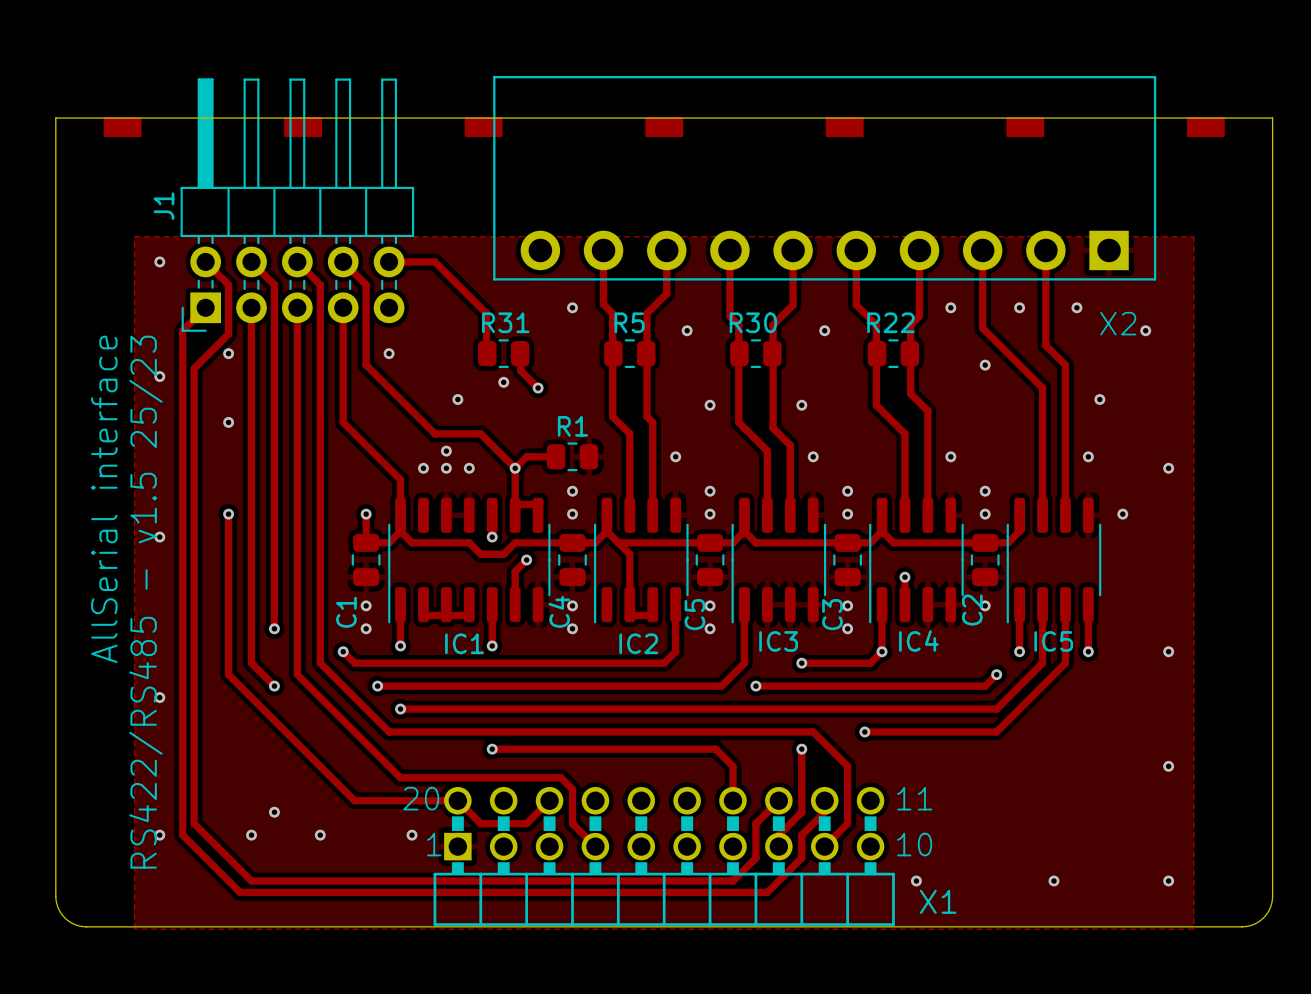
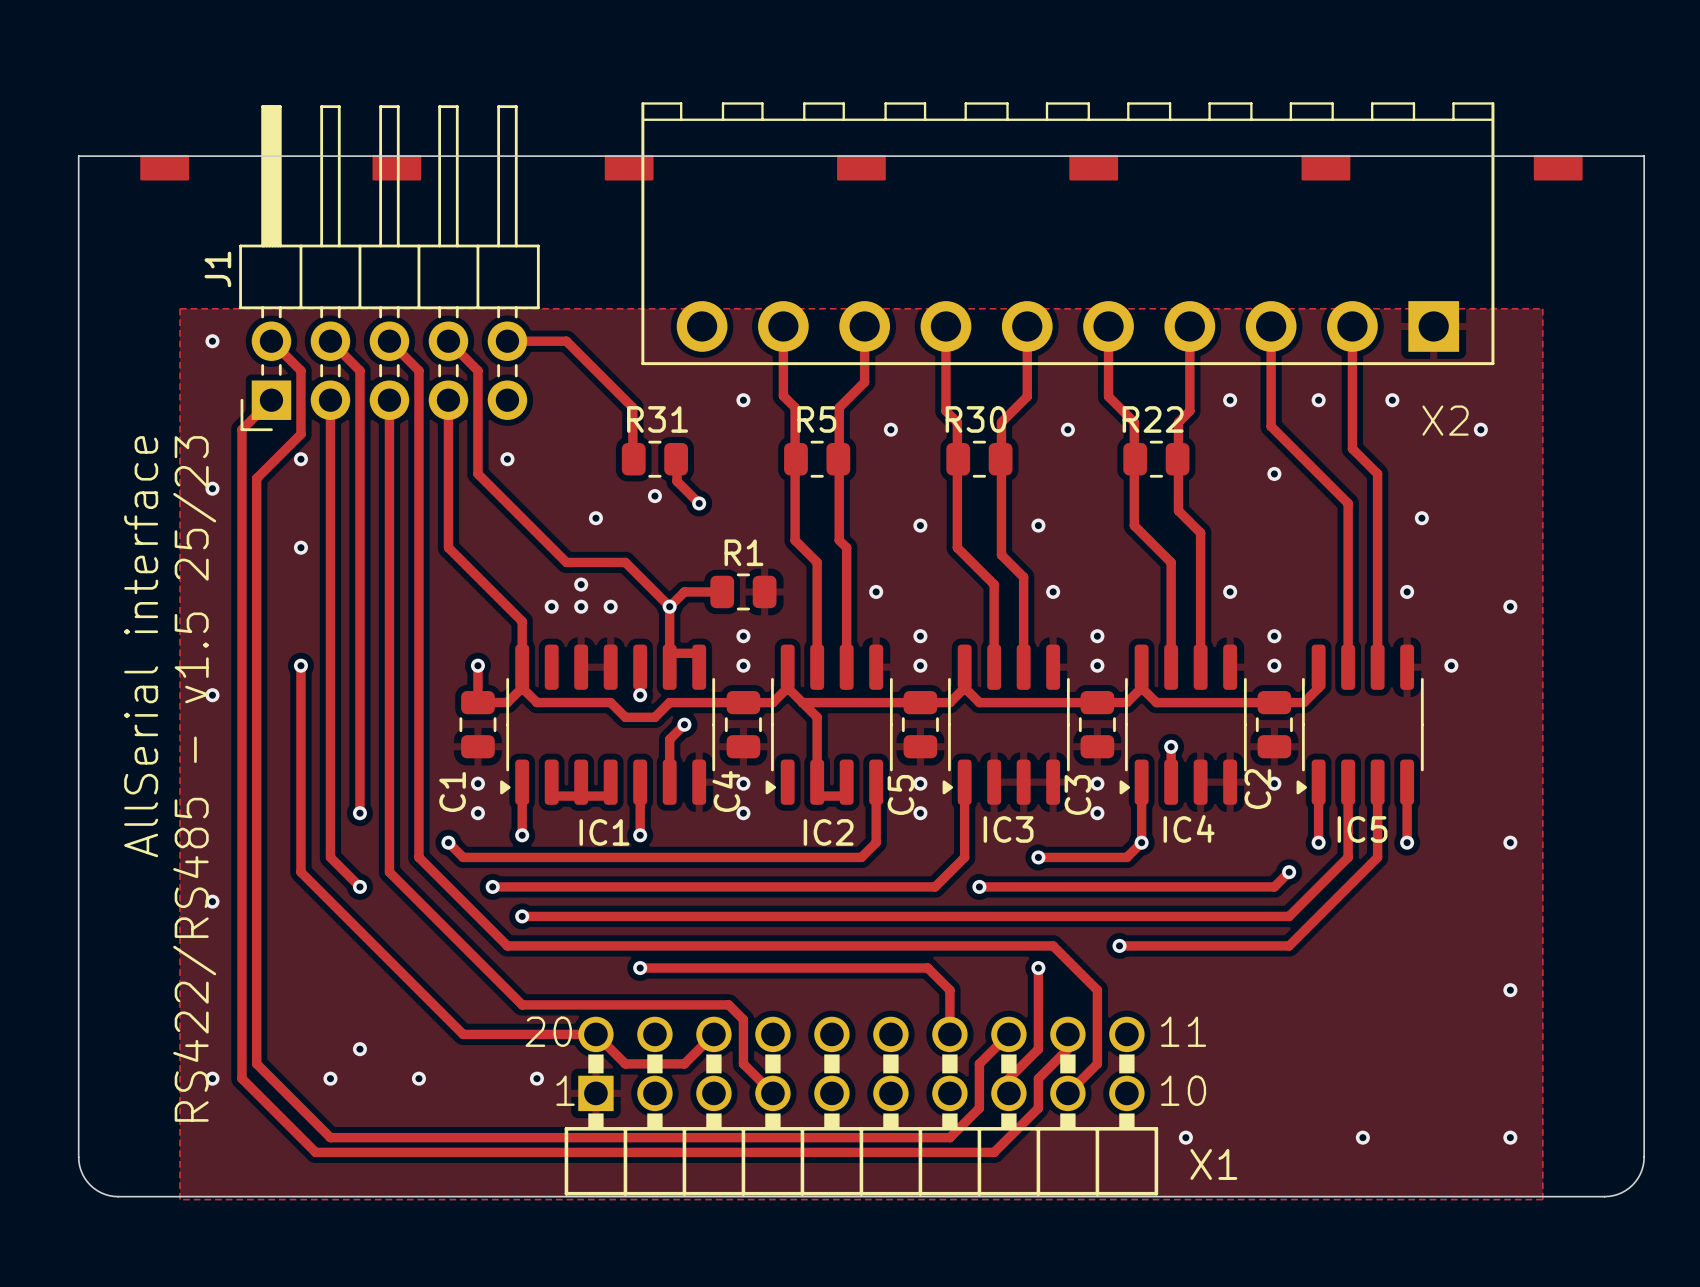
X2 footprint: [493, 76, 1157, 281] -> [641, 102, 1495, 366]
IC1 footprint: [388, 497, 551, 624] -> [500, 644, 716, 805]
IC2 footprint: [593, 497, 689, 624] -> [765, 644, 893, 805]
IC3 footprint: [731, 497, 827, 624] -> [942, 644, 1070, 805]
IC4 footprint: [869, 497, 964, 624] -> [1119, 644, 1247, 805]
IC5 footprint: [1006, 497, 1102, 624] -> [1296, 644, 1424, 805]

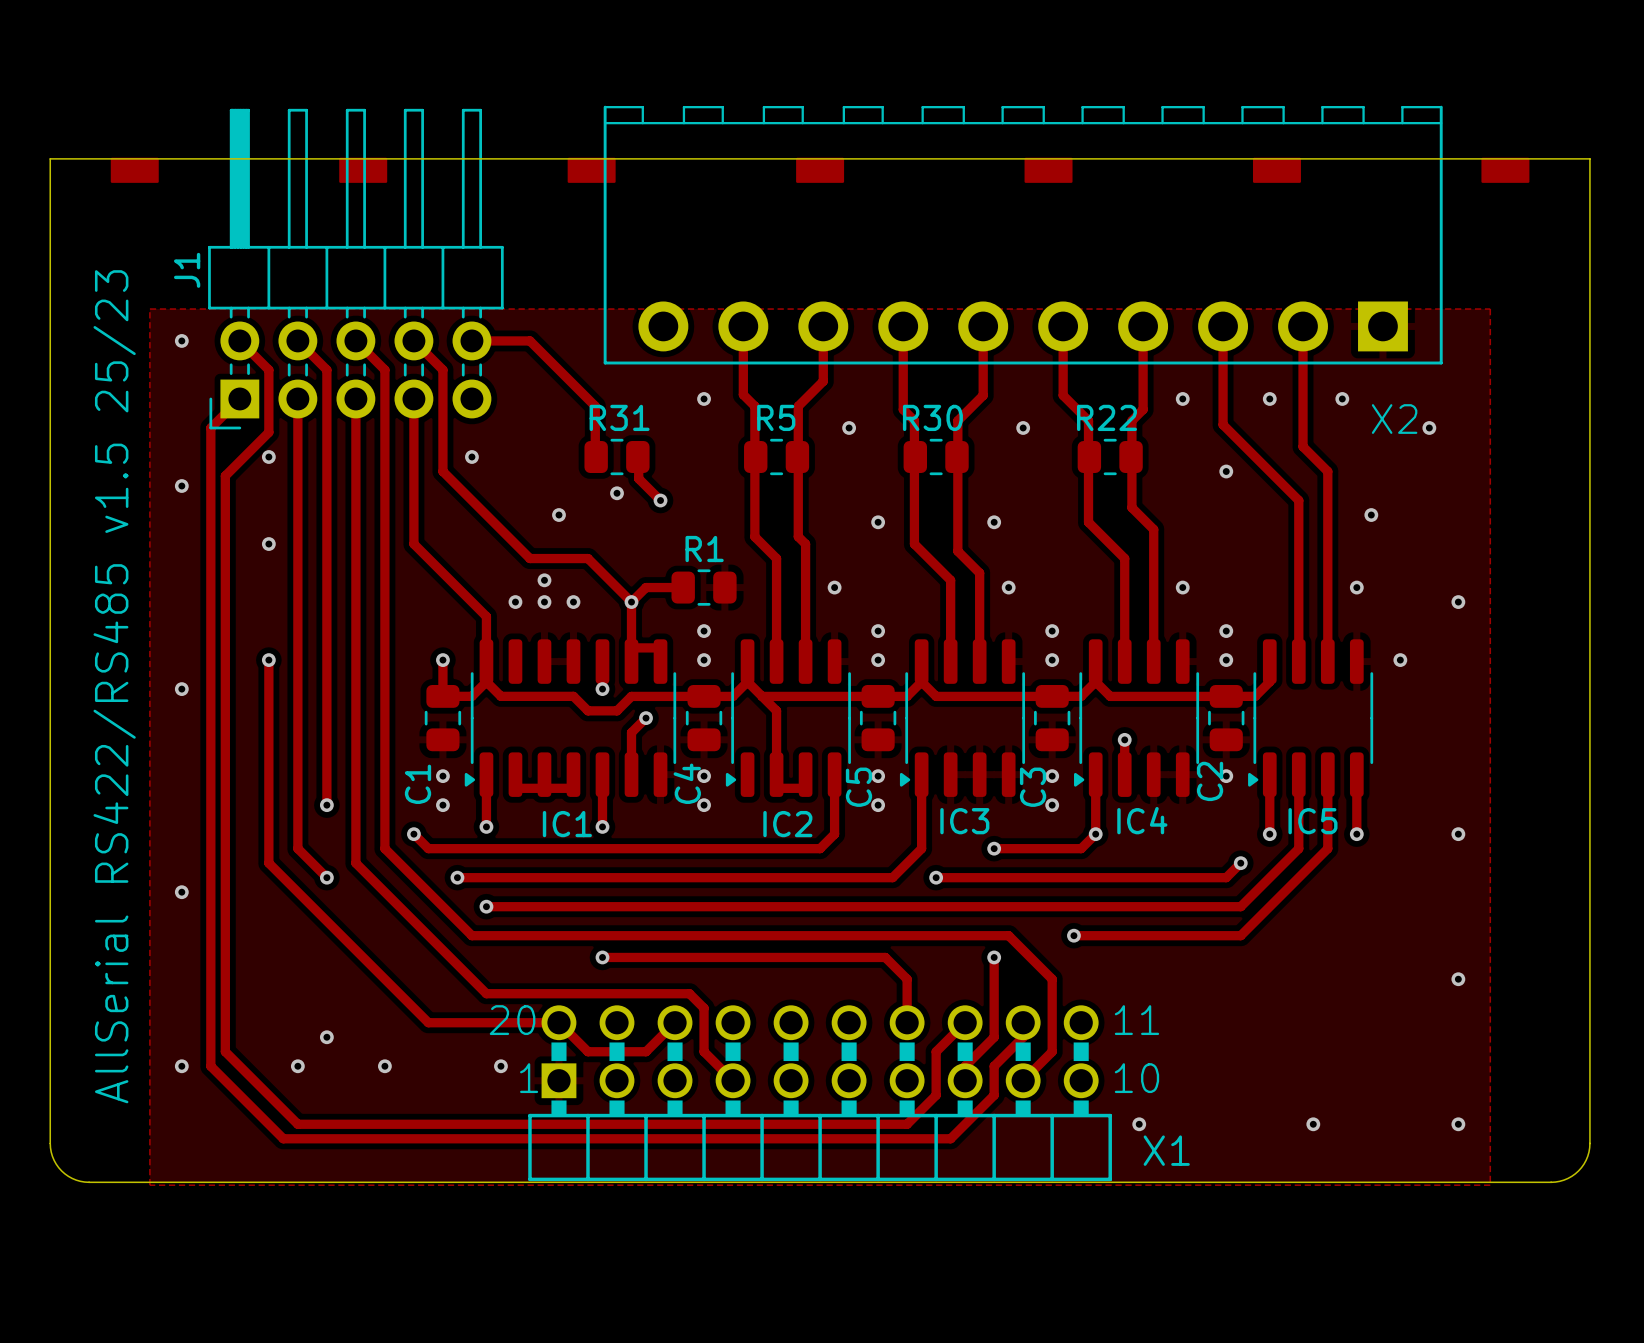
text: AllSerial interface (141, 646) -> none
text: RS422/RS485 - v1.5 25/23 (194, 778) -> AllSerial RS422/RS485 v1.5 25/23 (114, 686)

